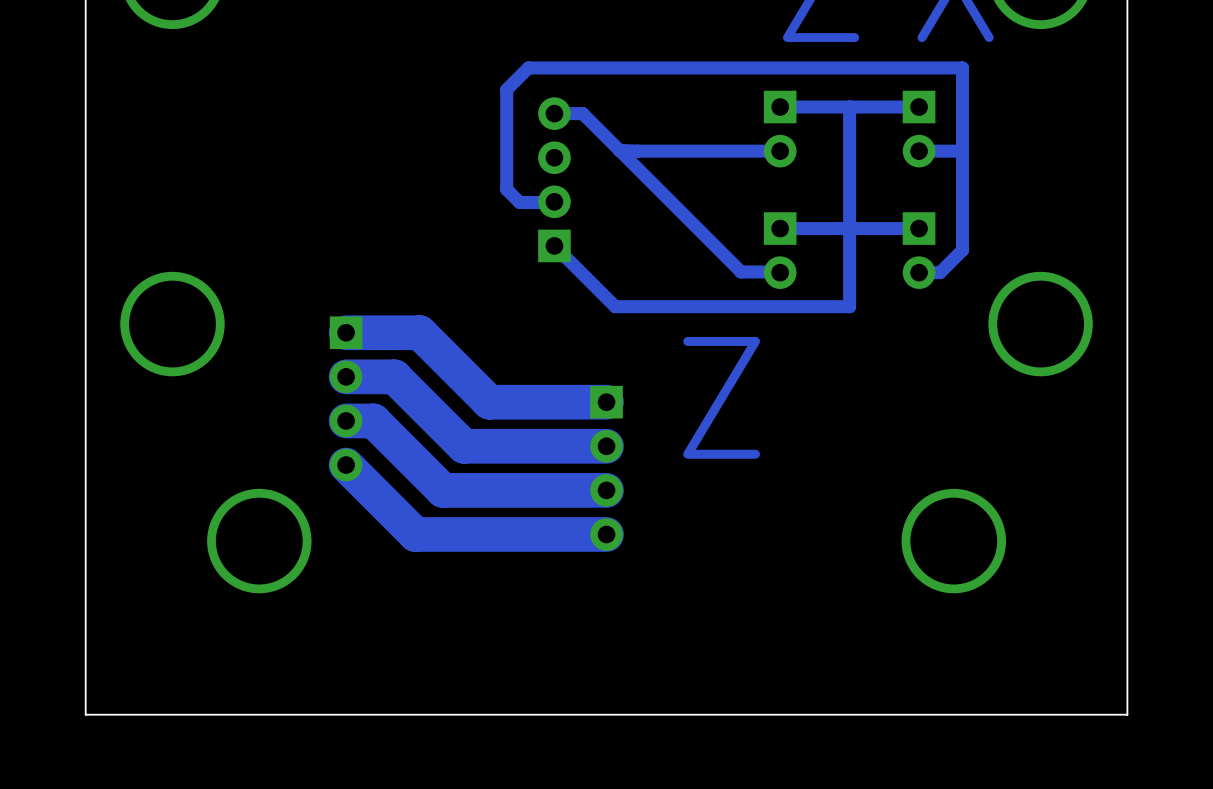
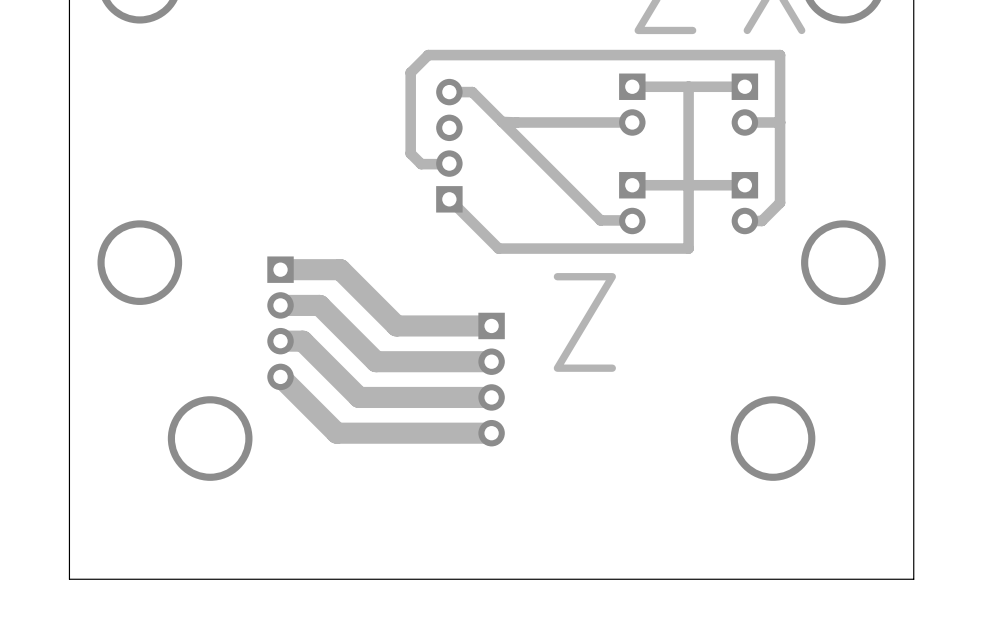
track width: thick (346, 332) (419, 332) (489, 402) (606, 402) -> thin (280, 269) (340, 269) (396, 325) (491, 325)
track width: thick (346, 376) (394, 376) (464, 446) (606, 446) -> thin (280, 305) (319, 305) (376, 361) (491, 361)
track width: thick (346, 420) (373, 420) (442, 490) (606, 490) -> thin (280, 341) (302, 341) (359, 397) (491, 397)
track width: thick (346, 465) (415, 534) (606, 534) -> thin (280, 376) (336, 433) (491, 433)

